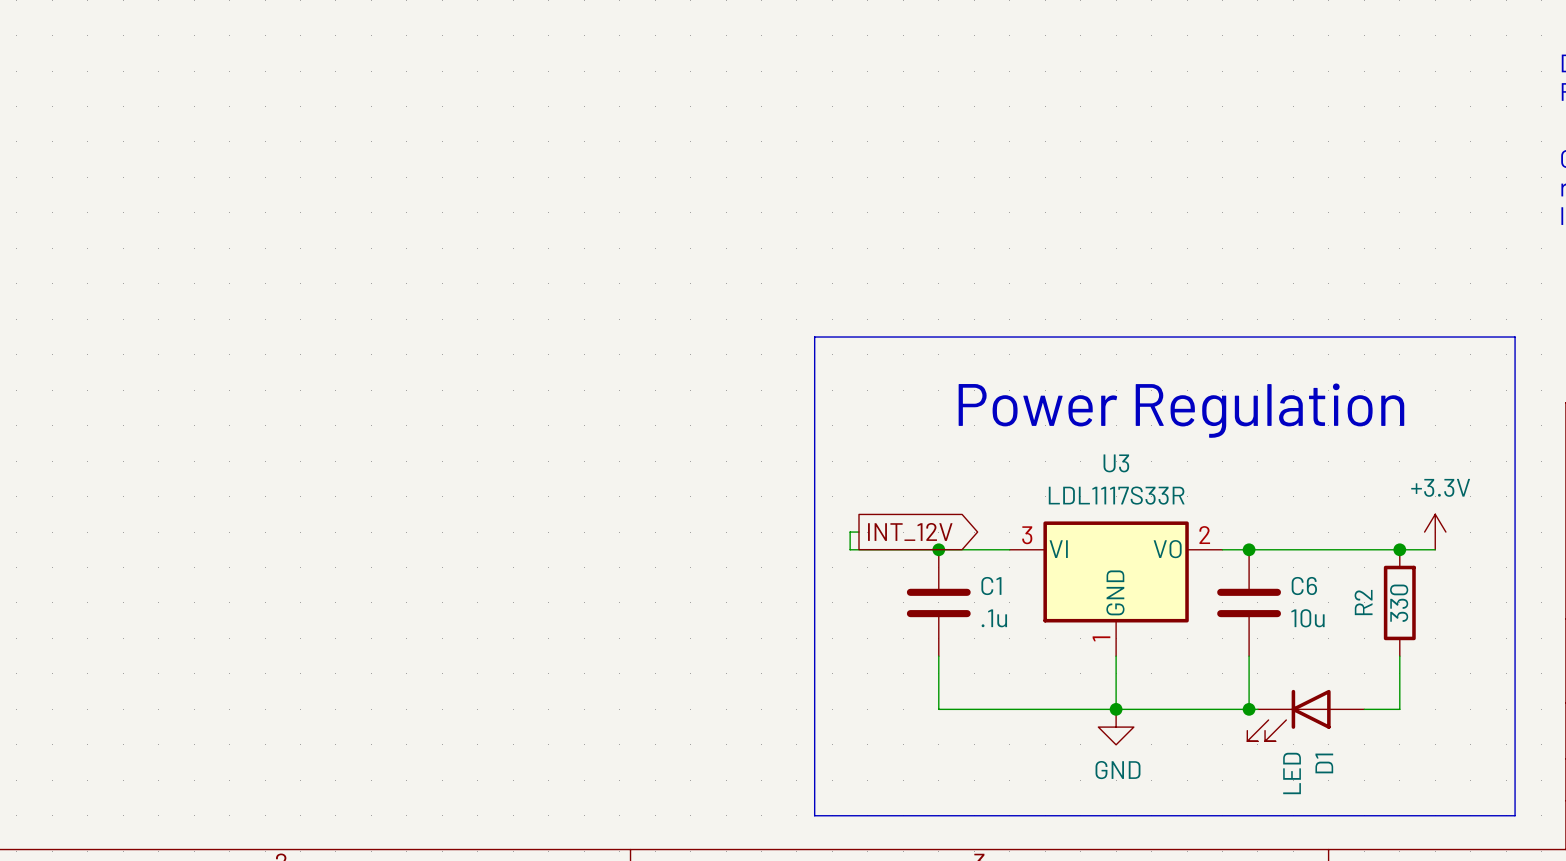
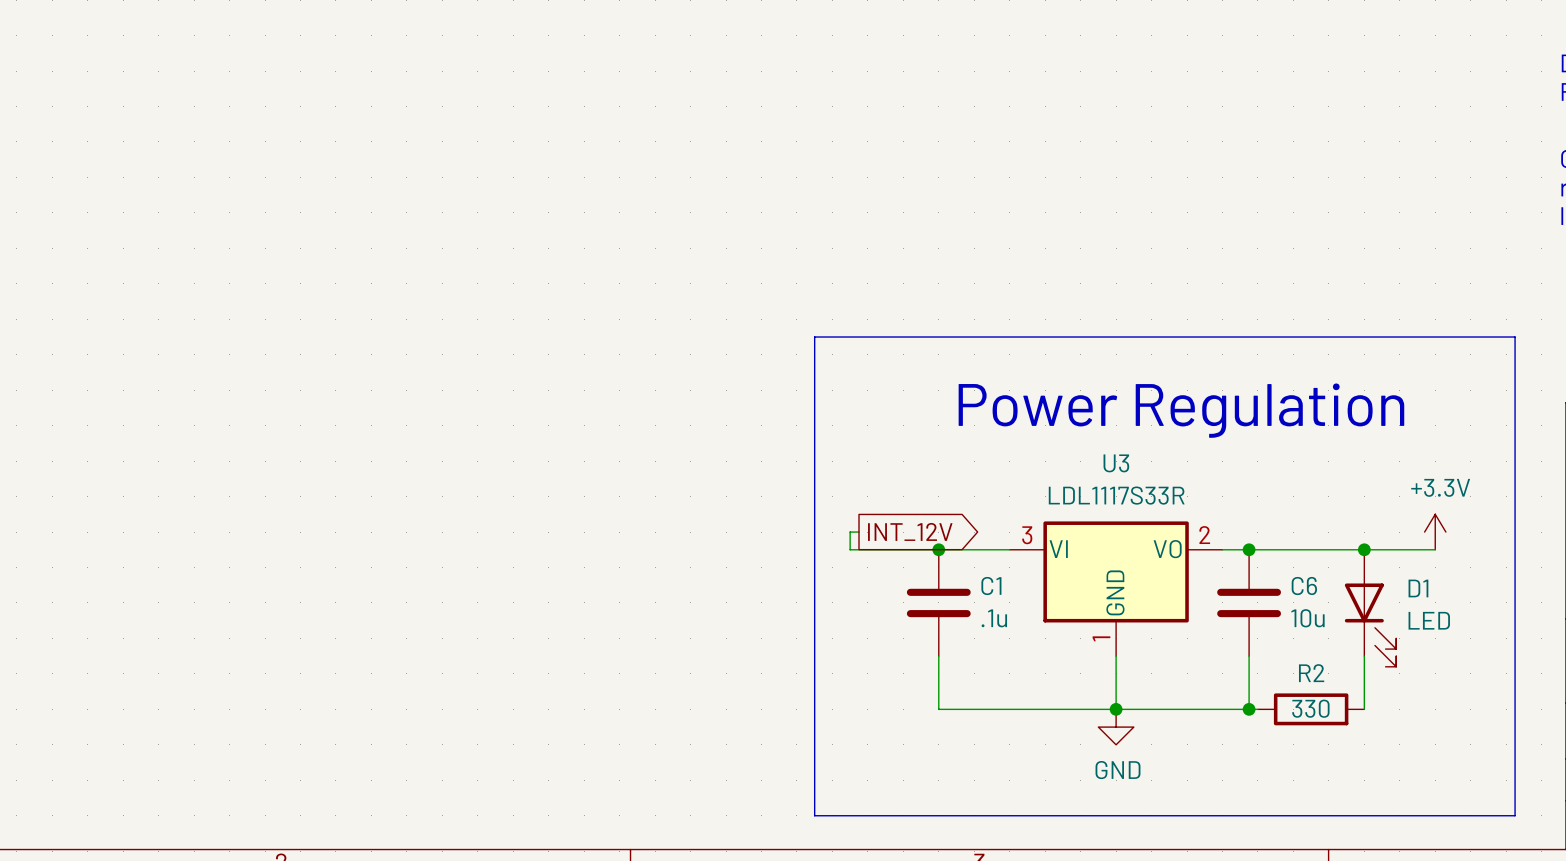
junction position: (1399, 549) -> (1364, 549)
R2 rotation: 0° (1399, 602) -> 90° clockwise (1311, 709)
R2 position: (1399, 602) -> (1311, 709)
wire: (1399, 656) (1399, 709) (1364, 709) -> (1364, 656) (1364, 709)
D1 rotation: 0° (1288, 715) -> 90° counterclockwise (1370, 625)
D1 position: (1305, 715) -> (1370, 608)

